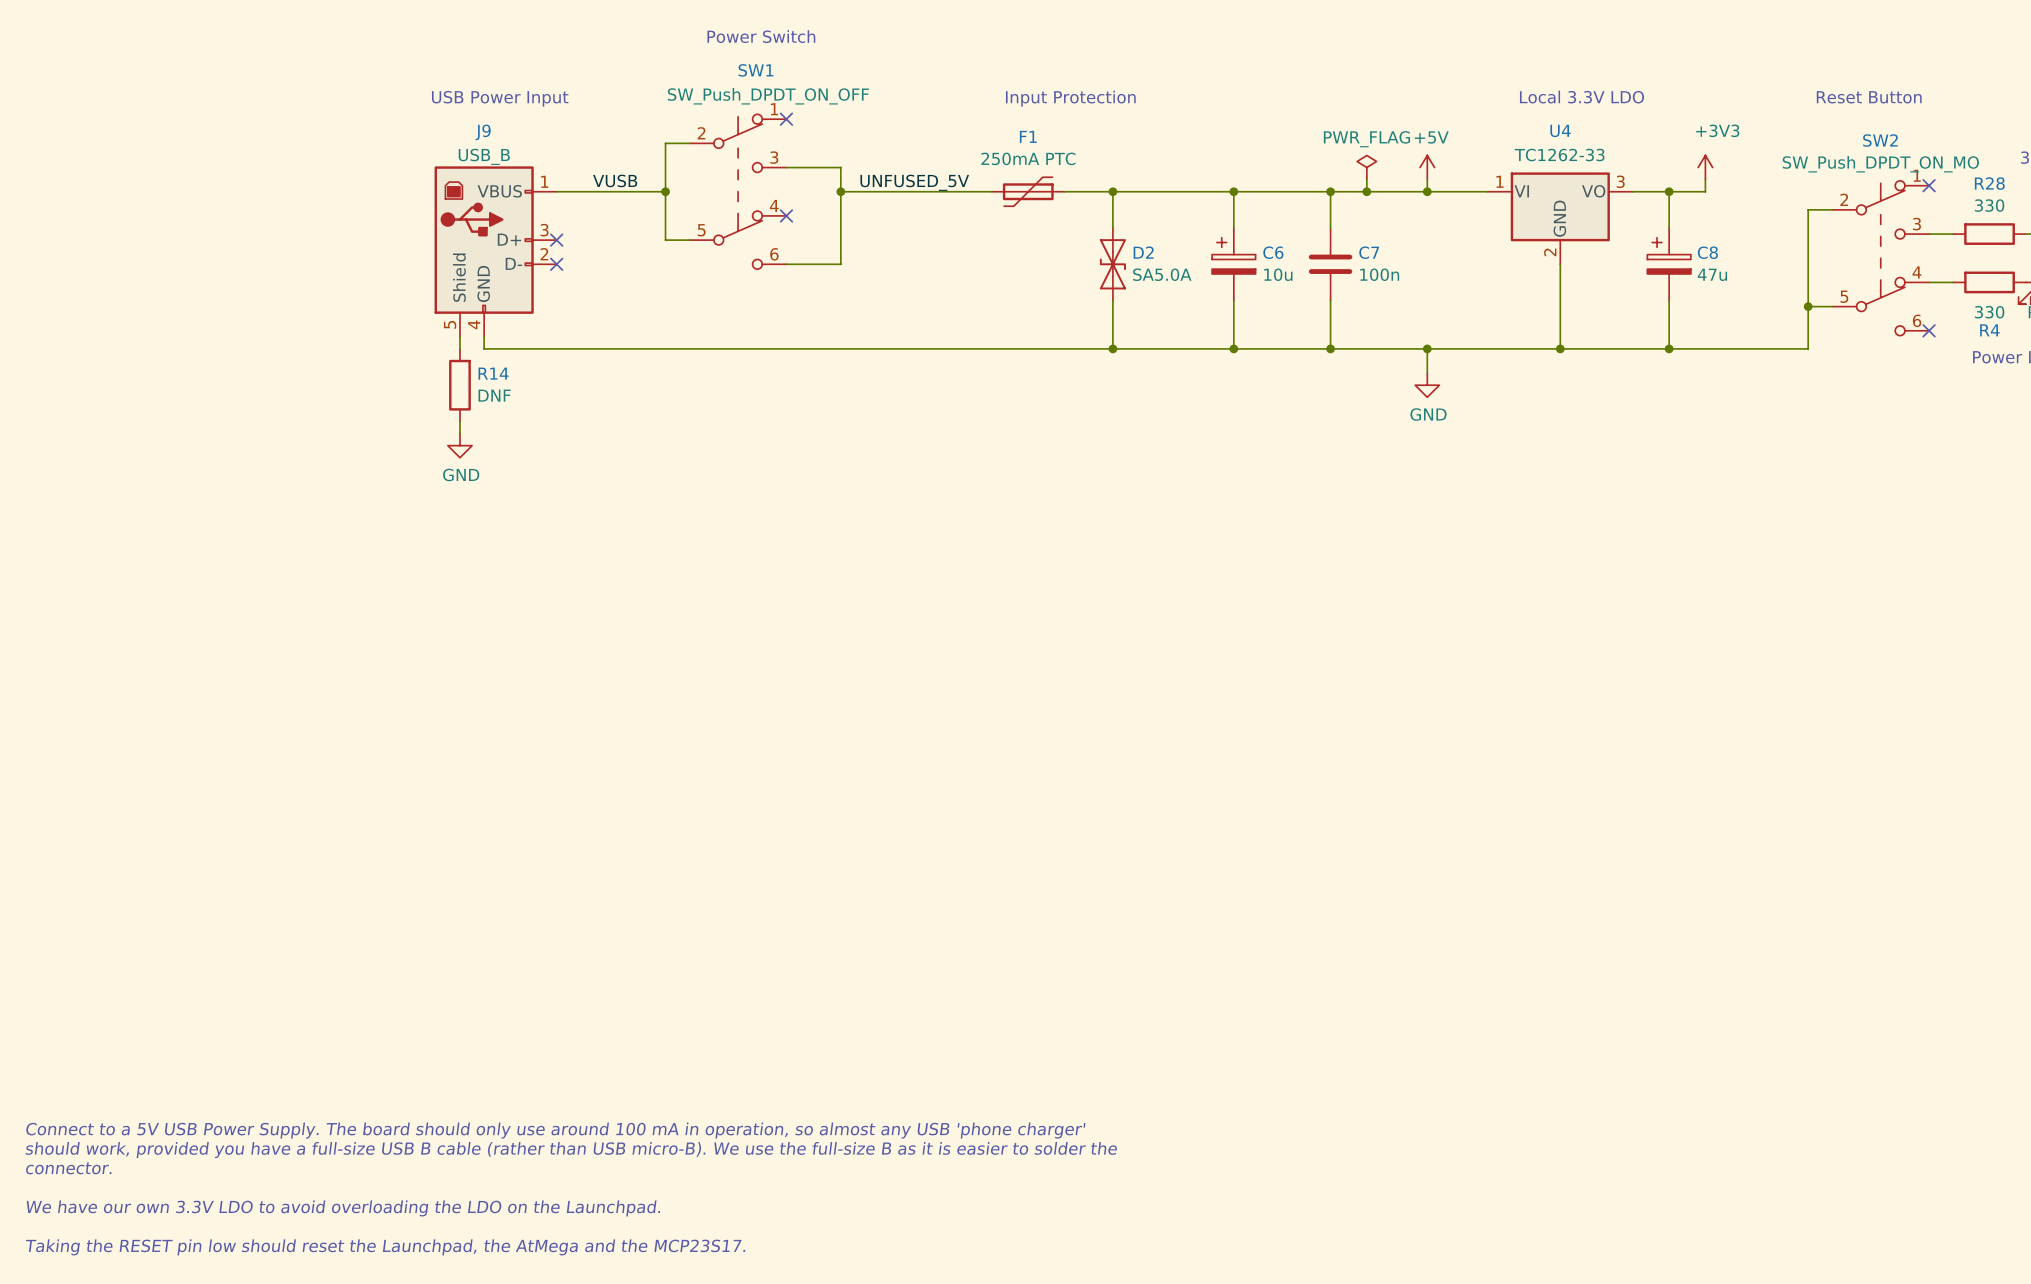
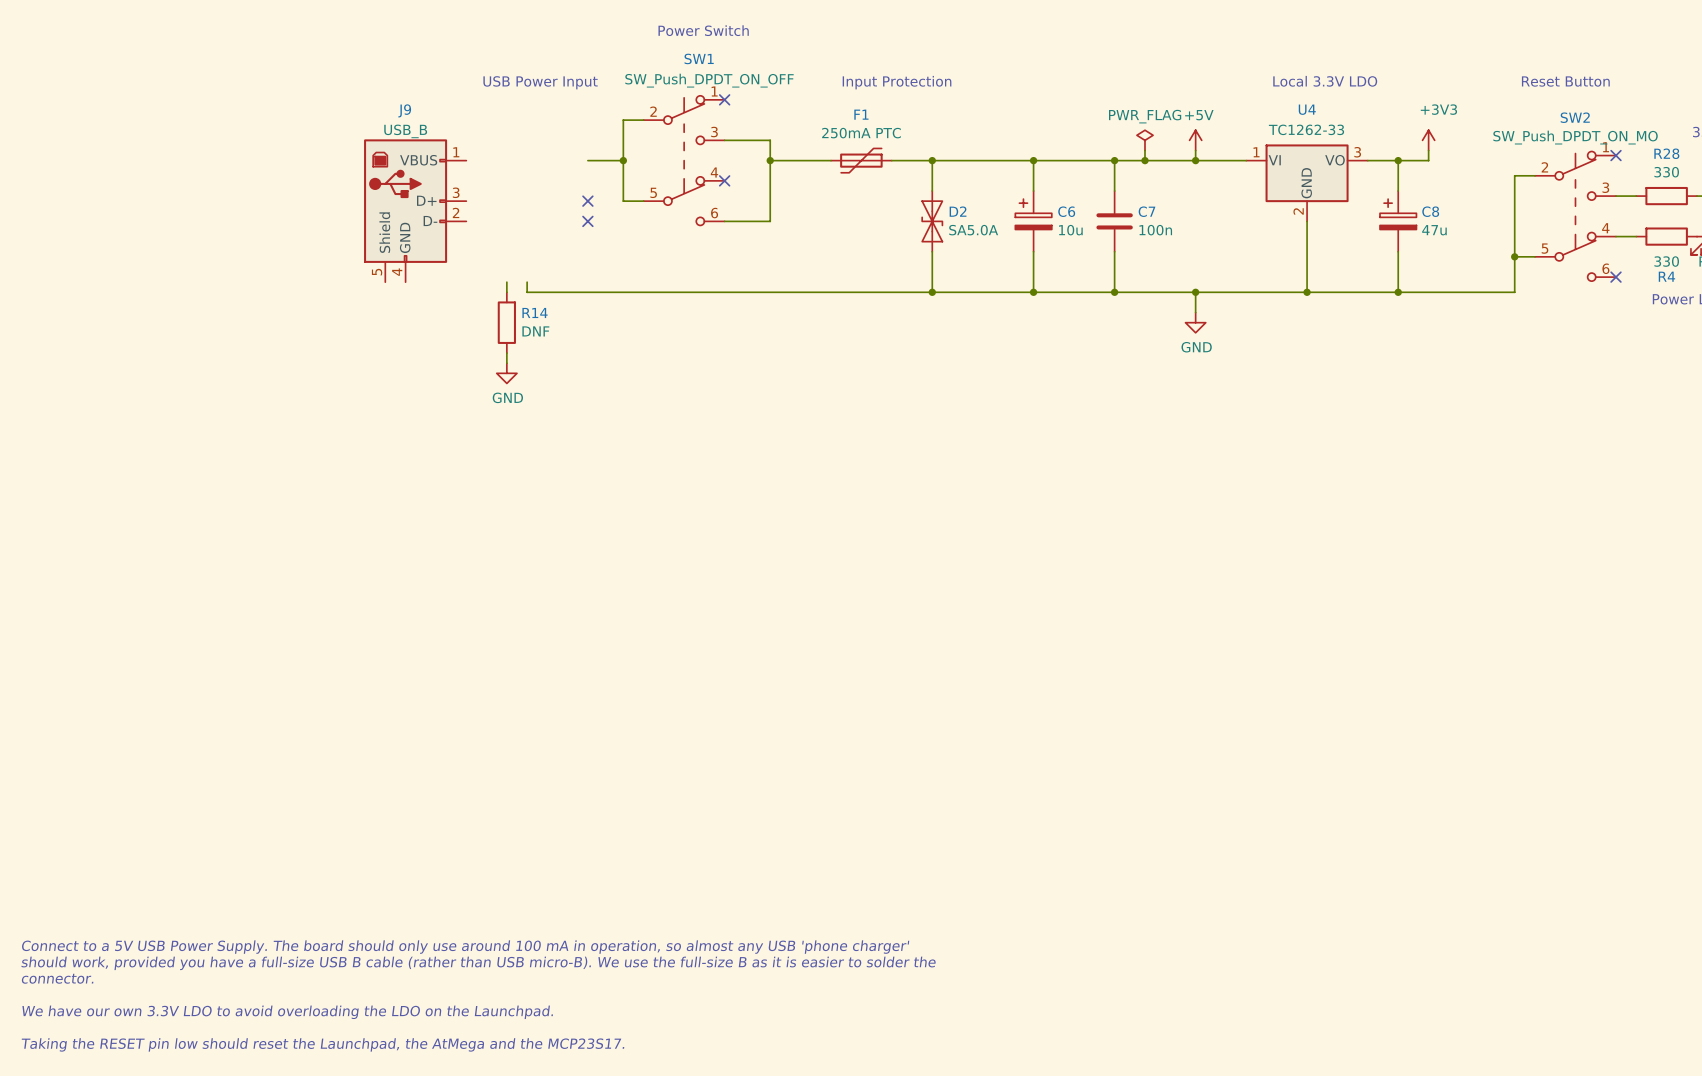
text position: Power Switch (761, 36) -> Power Switch (703, 30)
text position: USB Power Input (500, 98) -> USB Power Input (540, 82)
no-connect mark: (786, 119) -> none
no-connect mark: none -> (724, 99)
wire: (689, 143) (665, 143) (665, 240) (689, 240) -> (643, 120) (623, 120) (623, 201) (643, 201)
wire: (786, 167) (840, 167) (840, 264) (786, 264) -> (724, 140) (770, 140) (770, 221) (724, 221)
label: VUSB (615, 180) -> none
label: UNFUSED_5V (914, 182) -> none
wire: (556, 191) (665, 191) -> none
junction: (665, 191) -> none
wire: none -> (587, 160) (623, 160)
SW1 position: (738, 191) -> (684, 160)
junction: none -> (623, 160)
wire: (840, 191) (919, 191) -> none
junction: (840, 191) -> none
junction: none -> (770, 160)
no-connect mark: (786, 215) -> none
no-connect mark: none -> (724, 180)
no-connect mark: (556, 240) -> none
no-connect mark: none -> (587, 201)
no-connect mark: (556, 264) -> none
no-connect mark: none -> (587, 221)
wire: (459, 336) (459, 348) -> (506, 282) (506, 292)
wire: (484, 336) (484, 348) (629, 348) -> (527, 282) (527, 292)
R14 position: (459, 385) -> (506, 322)
wire: (459, 421) (459, 433) -> (506, 353) (506, 363)
power symbol position: GND (459, 445) -> GND (506, 373)

